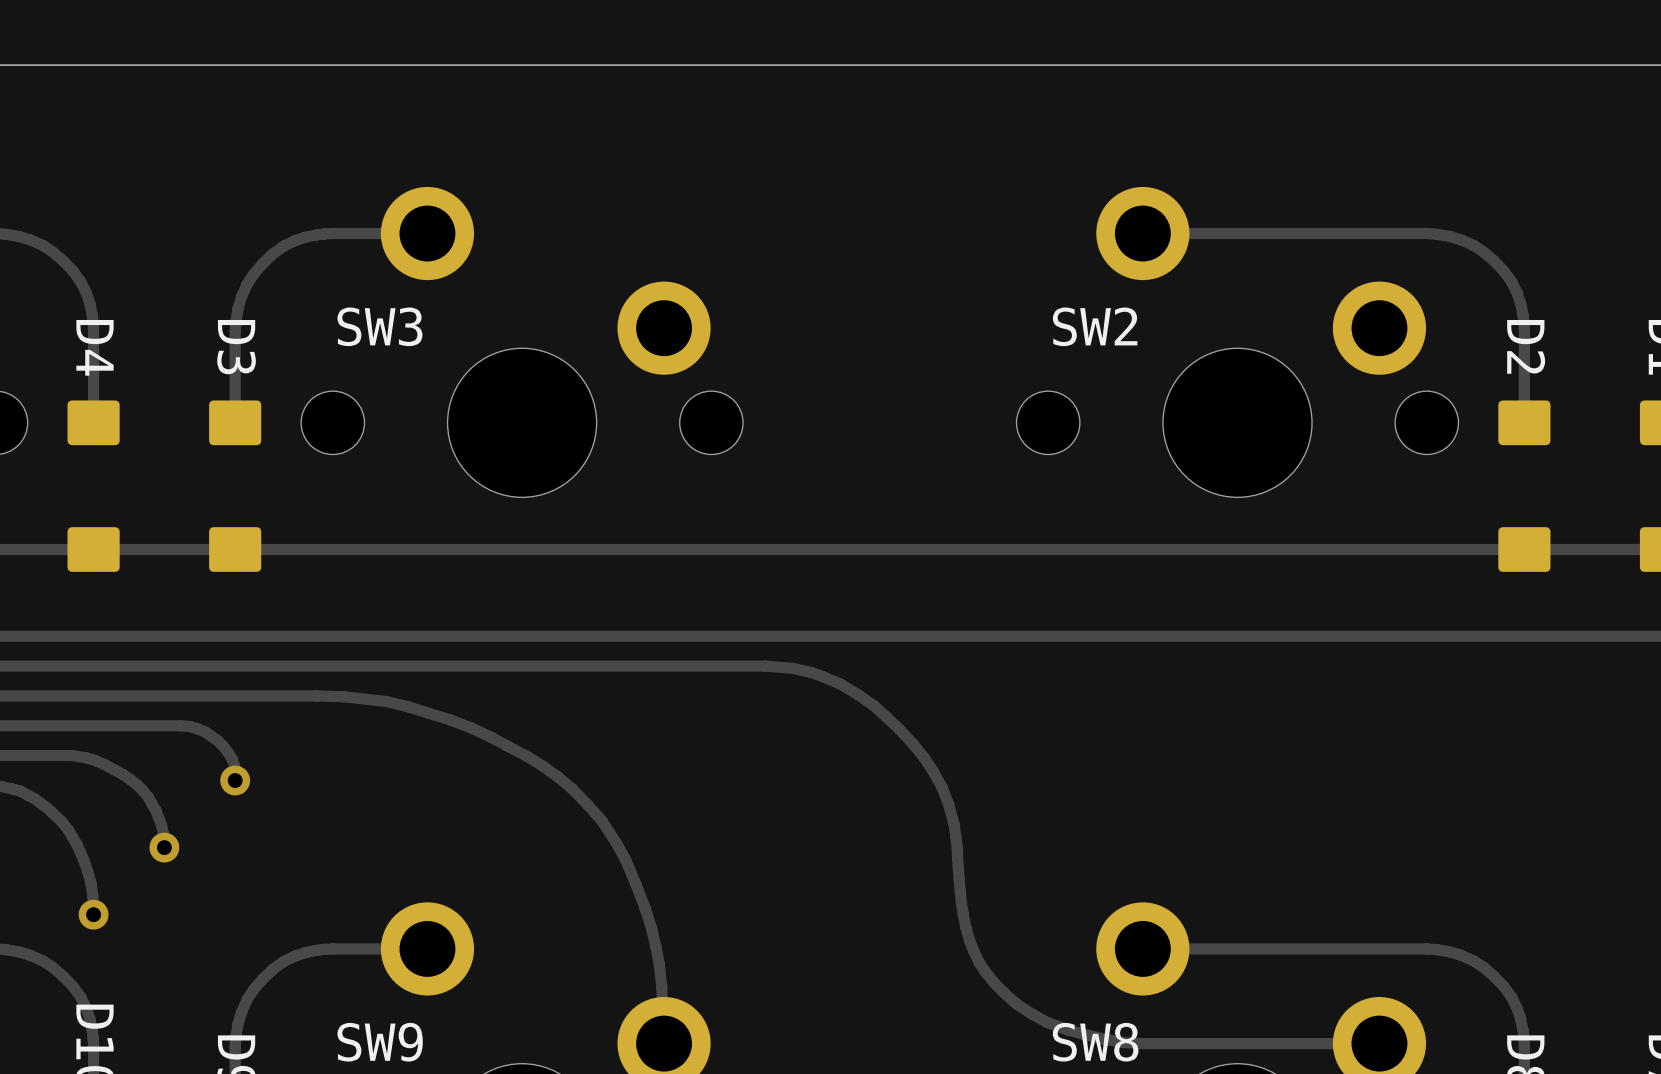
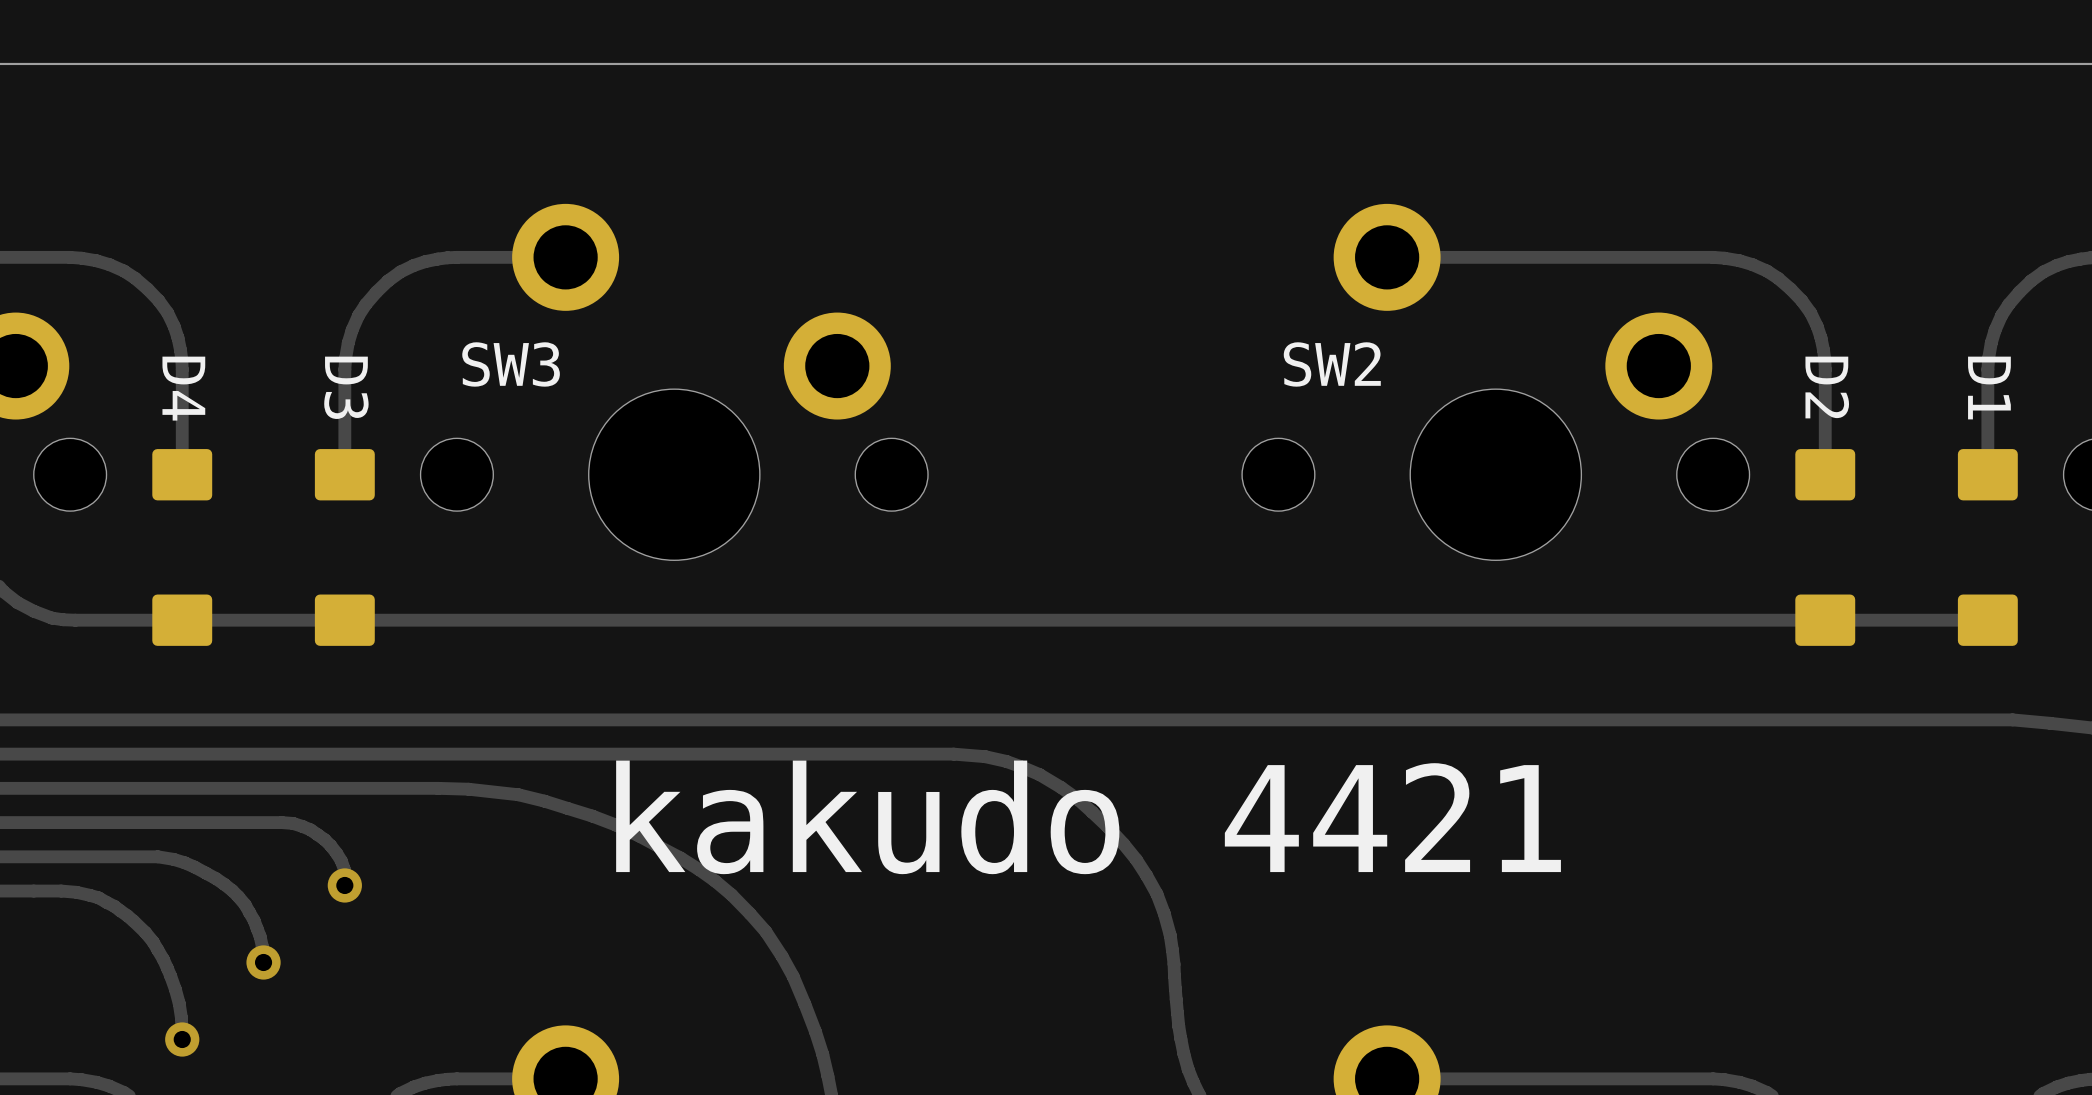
text: none -> kakudo 4421 (1088, 817)

